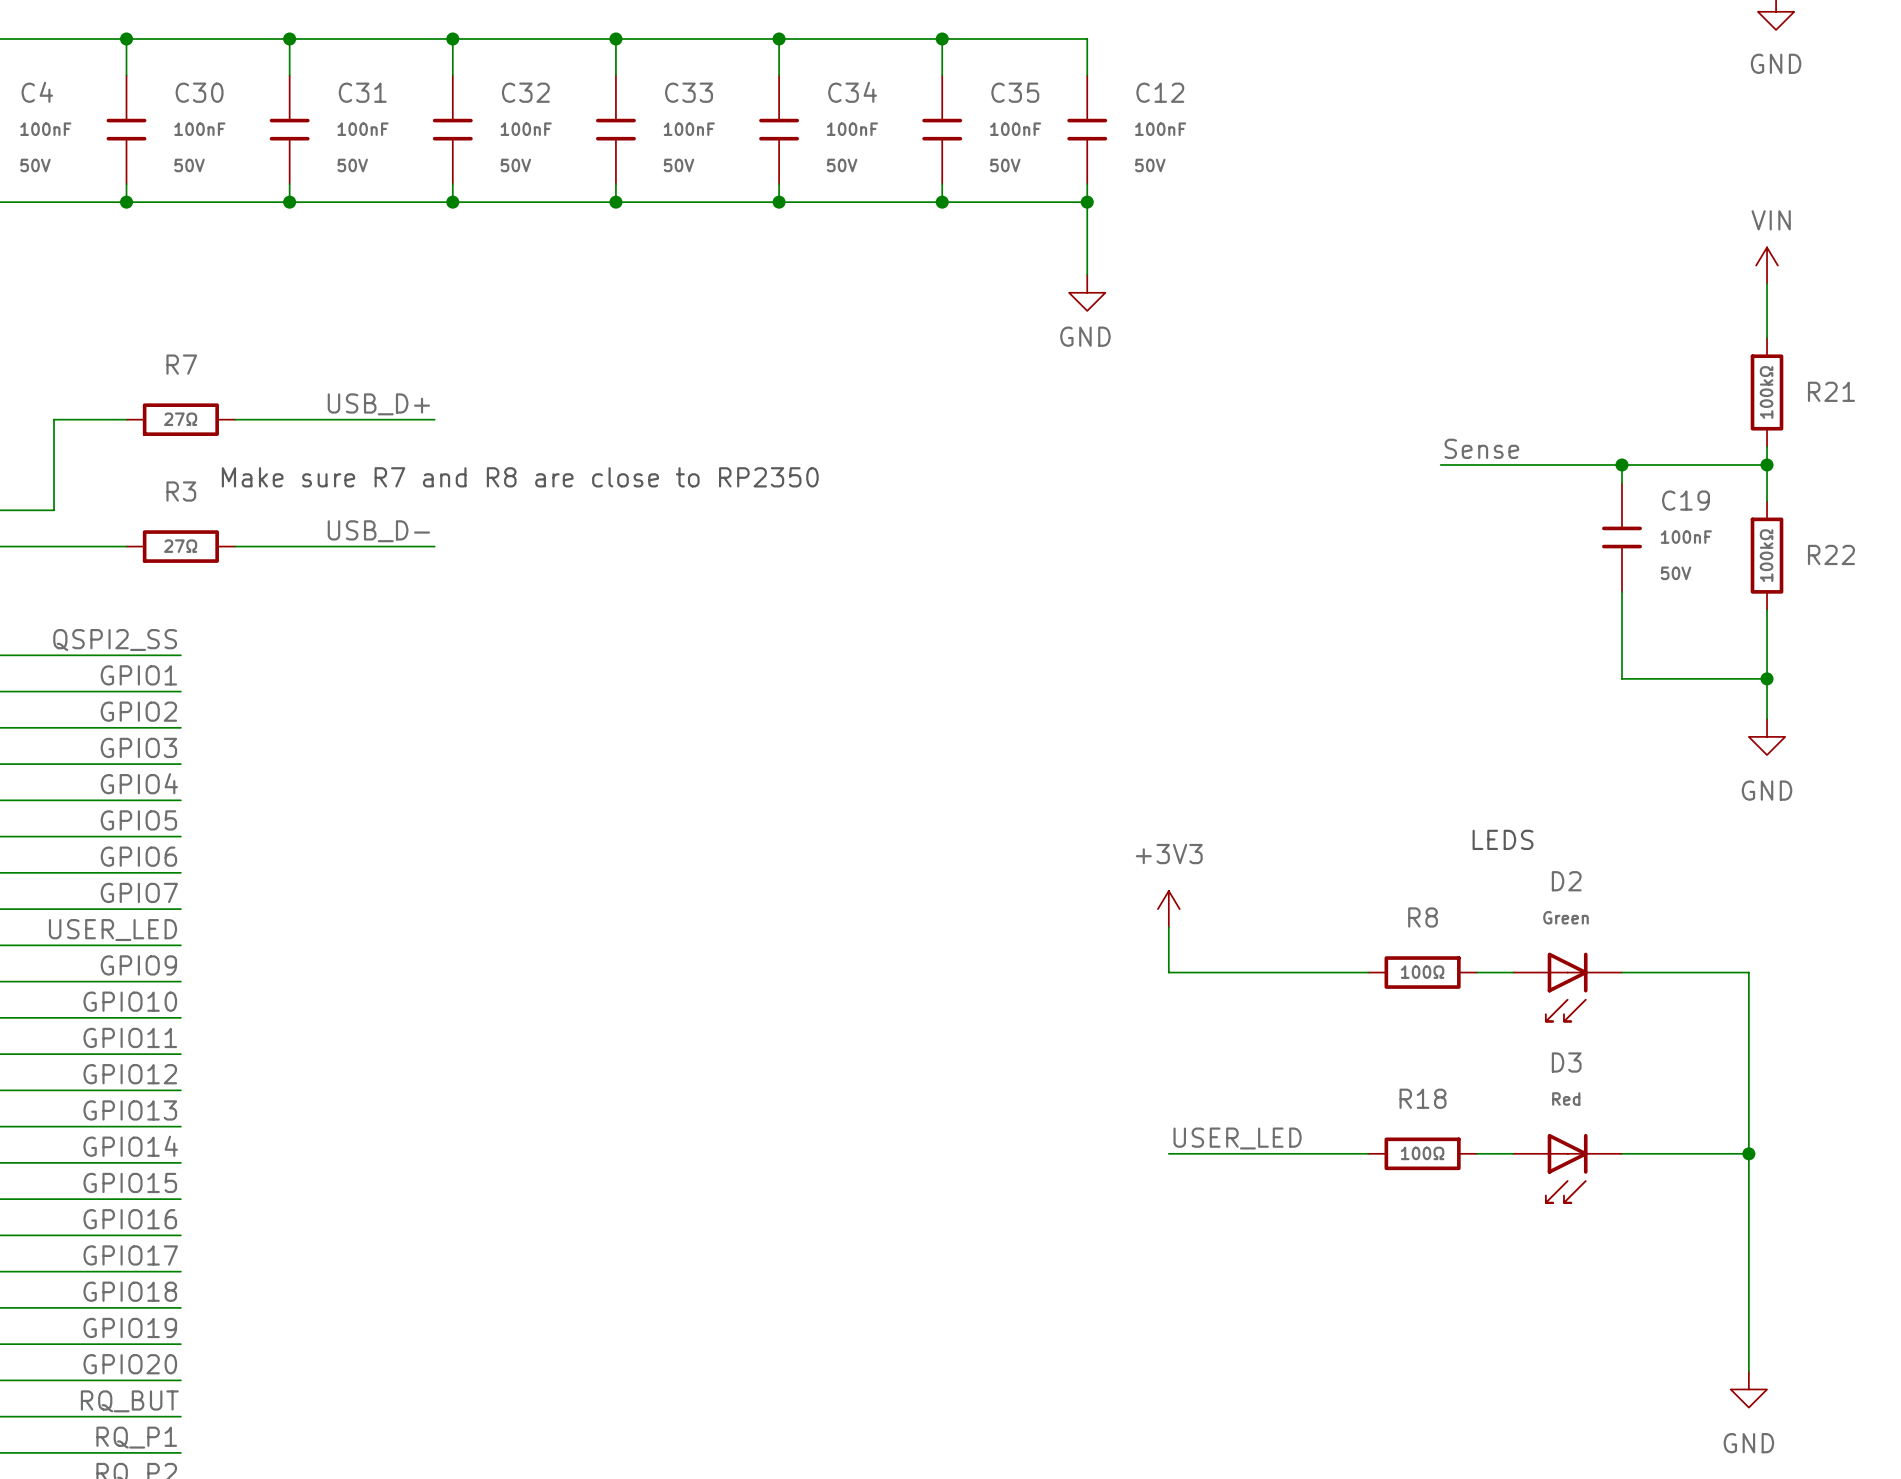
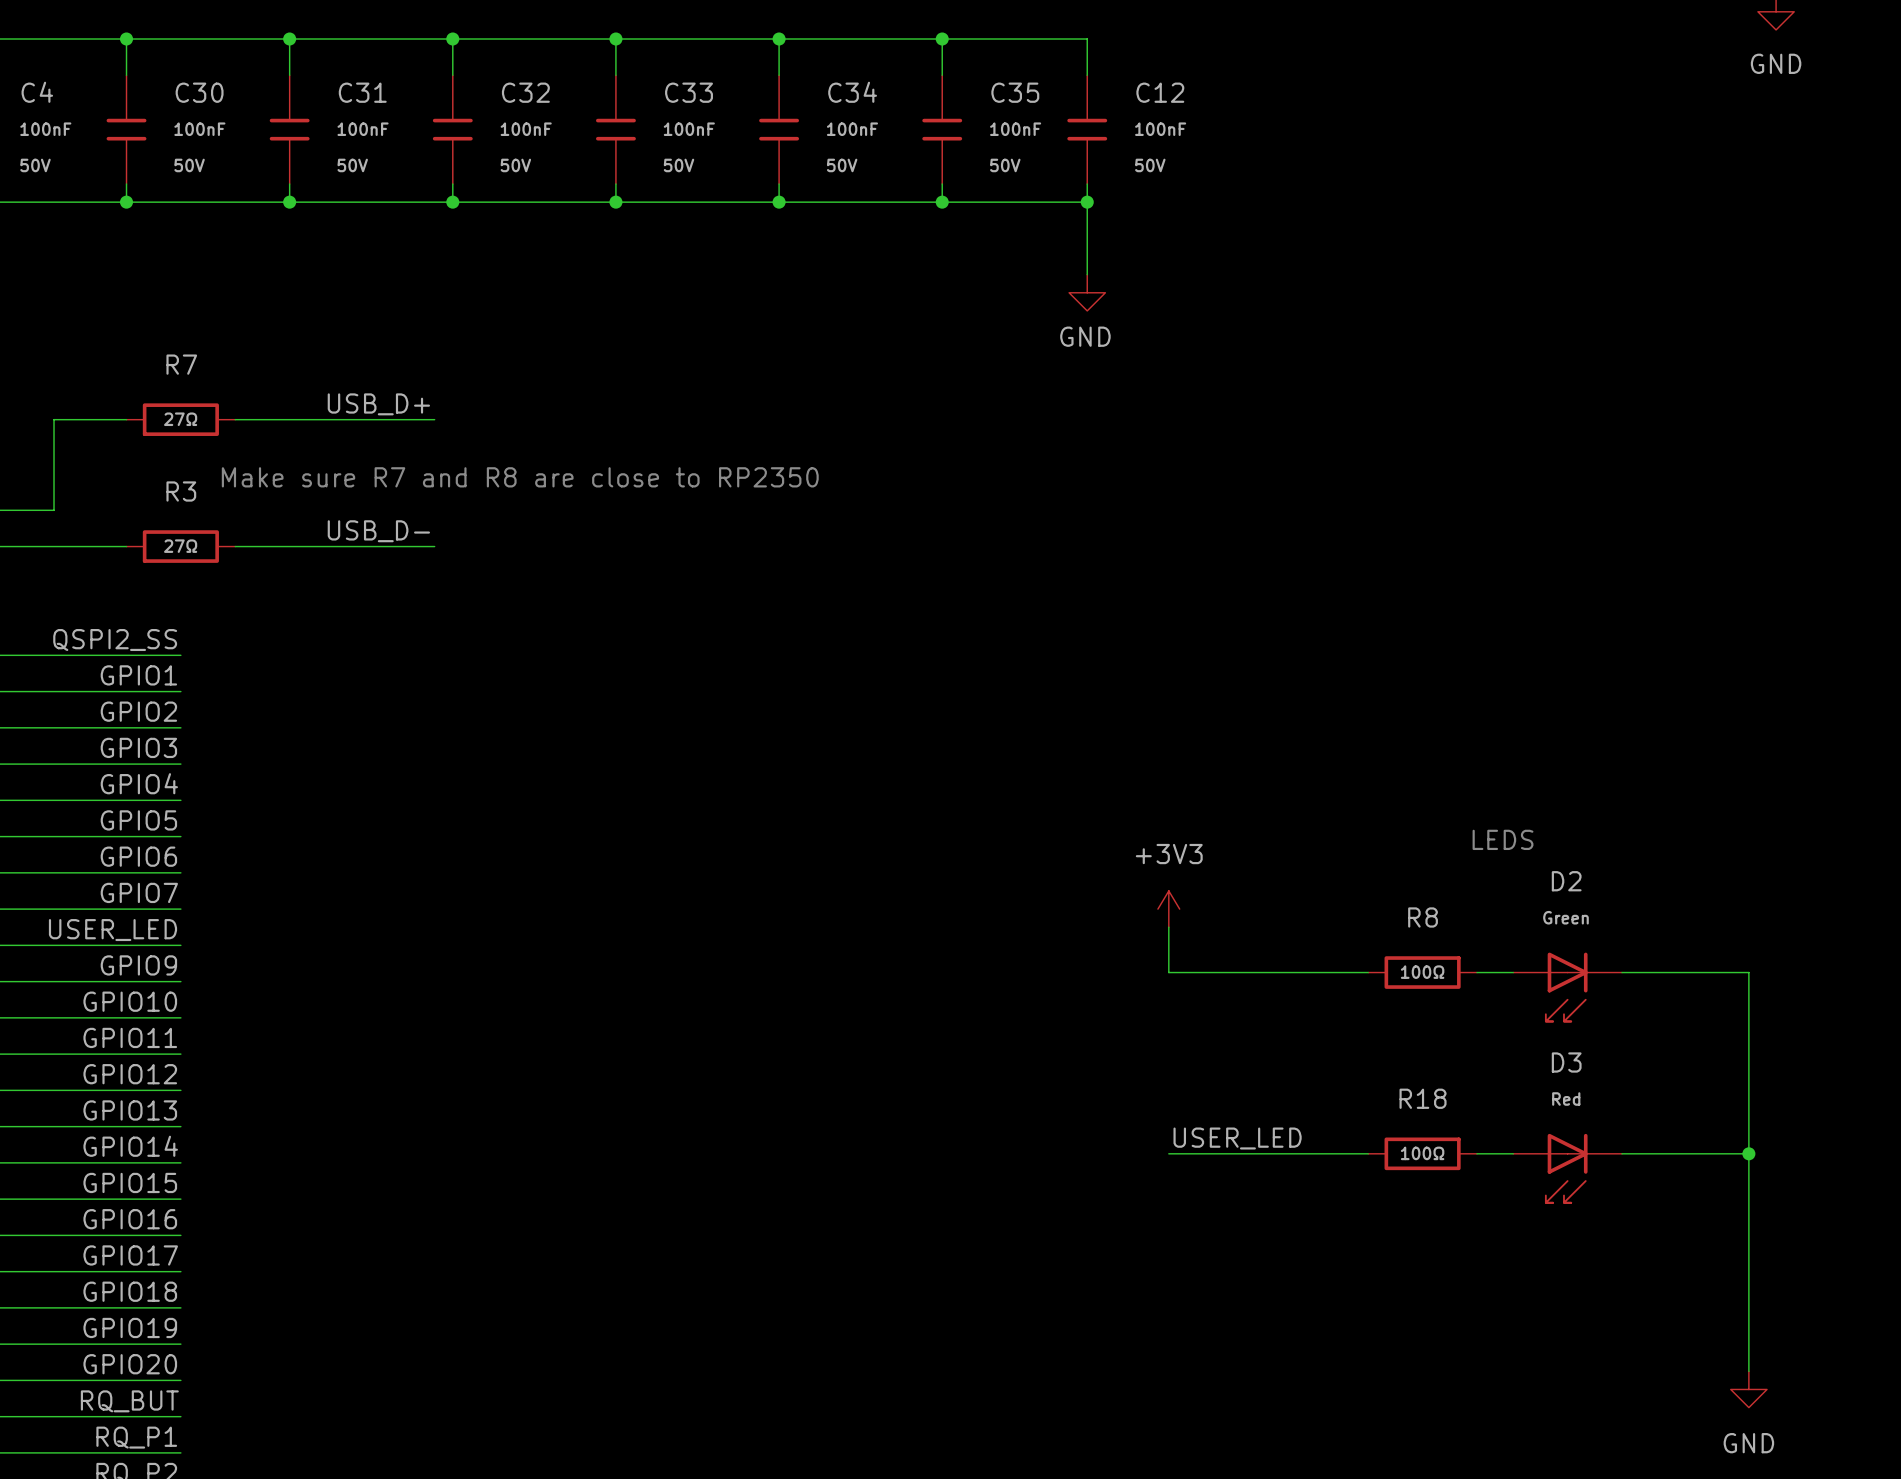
power symbol: VIN (1767, 265) -> none
wire: (1767, 283) (1767, 338) -> none
R21: 100kΩ (1767, 392) -> none
wire: (1767, 446) (1767, 501) -> none
label: Sense (1481, 448) -> none
wire: (1440, 464) (1767, 464) -> none
wire: (1621, 464) (1621, 483) -> none
junction: (1621, 464) -> none
junction: (1767, 464) -> none
C19: 100nF (1621, 537) -> none
R22: 100kΩ (1767, 555) -> none
wire: (1621, 591) (1621, 678) (1767, 678) -> none
wire: (1767, 610) (1767, 718) -> none
junction: (1767, 678) -> none
power symbol: GND (1767, 736) -> none

